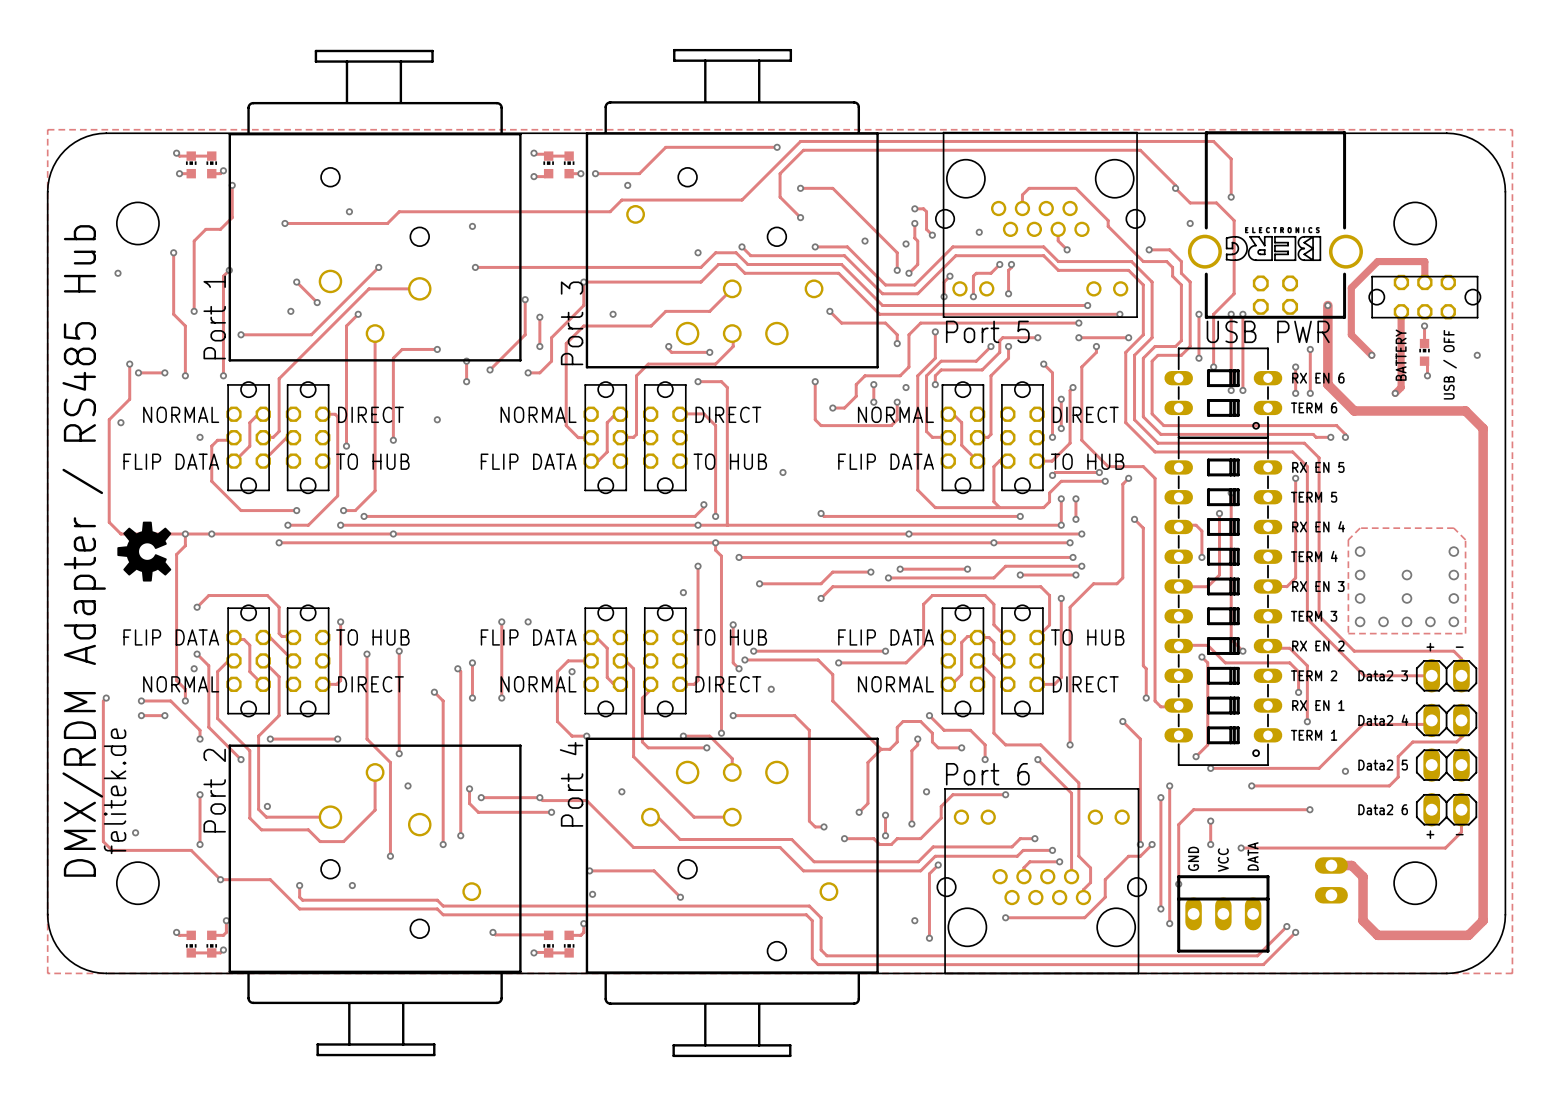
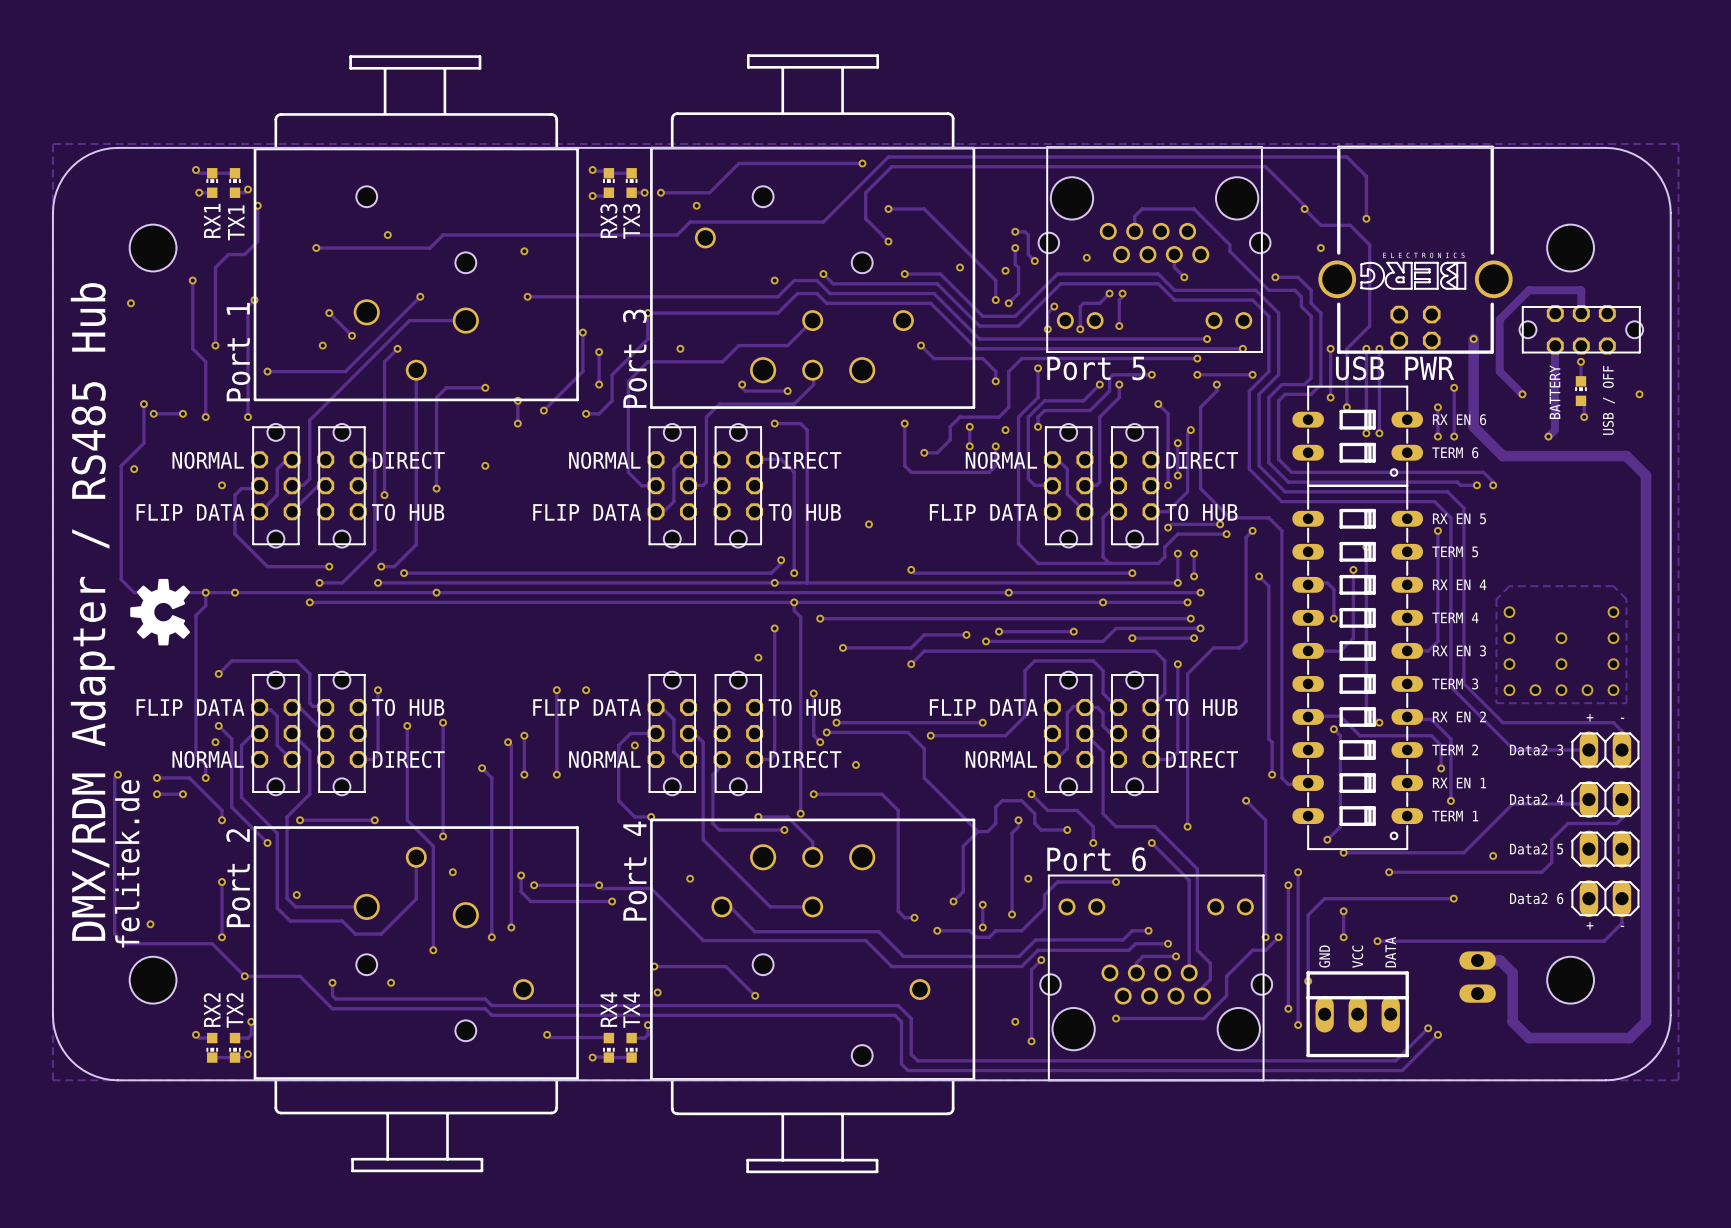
part value: none -> TX3 (631, 221)
part value: none -> RX1 (212, 220)
part value: none -> RX3 (608, 220)
part value: none -> TX1 (236, 222)
part value: none -> RX4 (608, 1009)
part value: none -> RX2 (212, 1010)
part value: none -> TX2 (234, 1010)
part value: none -> TX4 (631, 1010)

